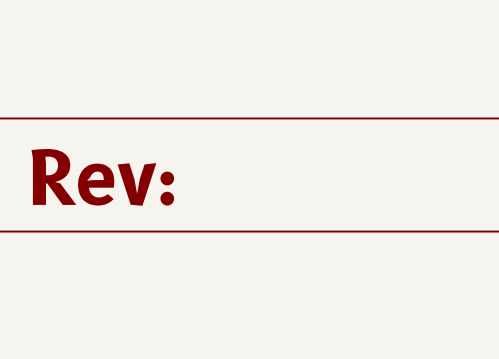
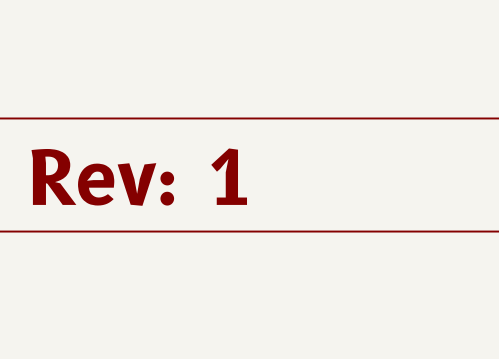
title block: Rev: (102, 177) -> Rev: 1 (139, 177)

